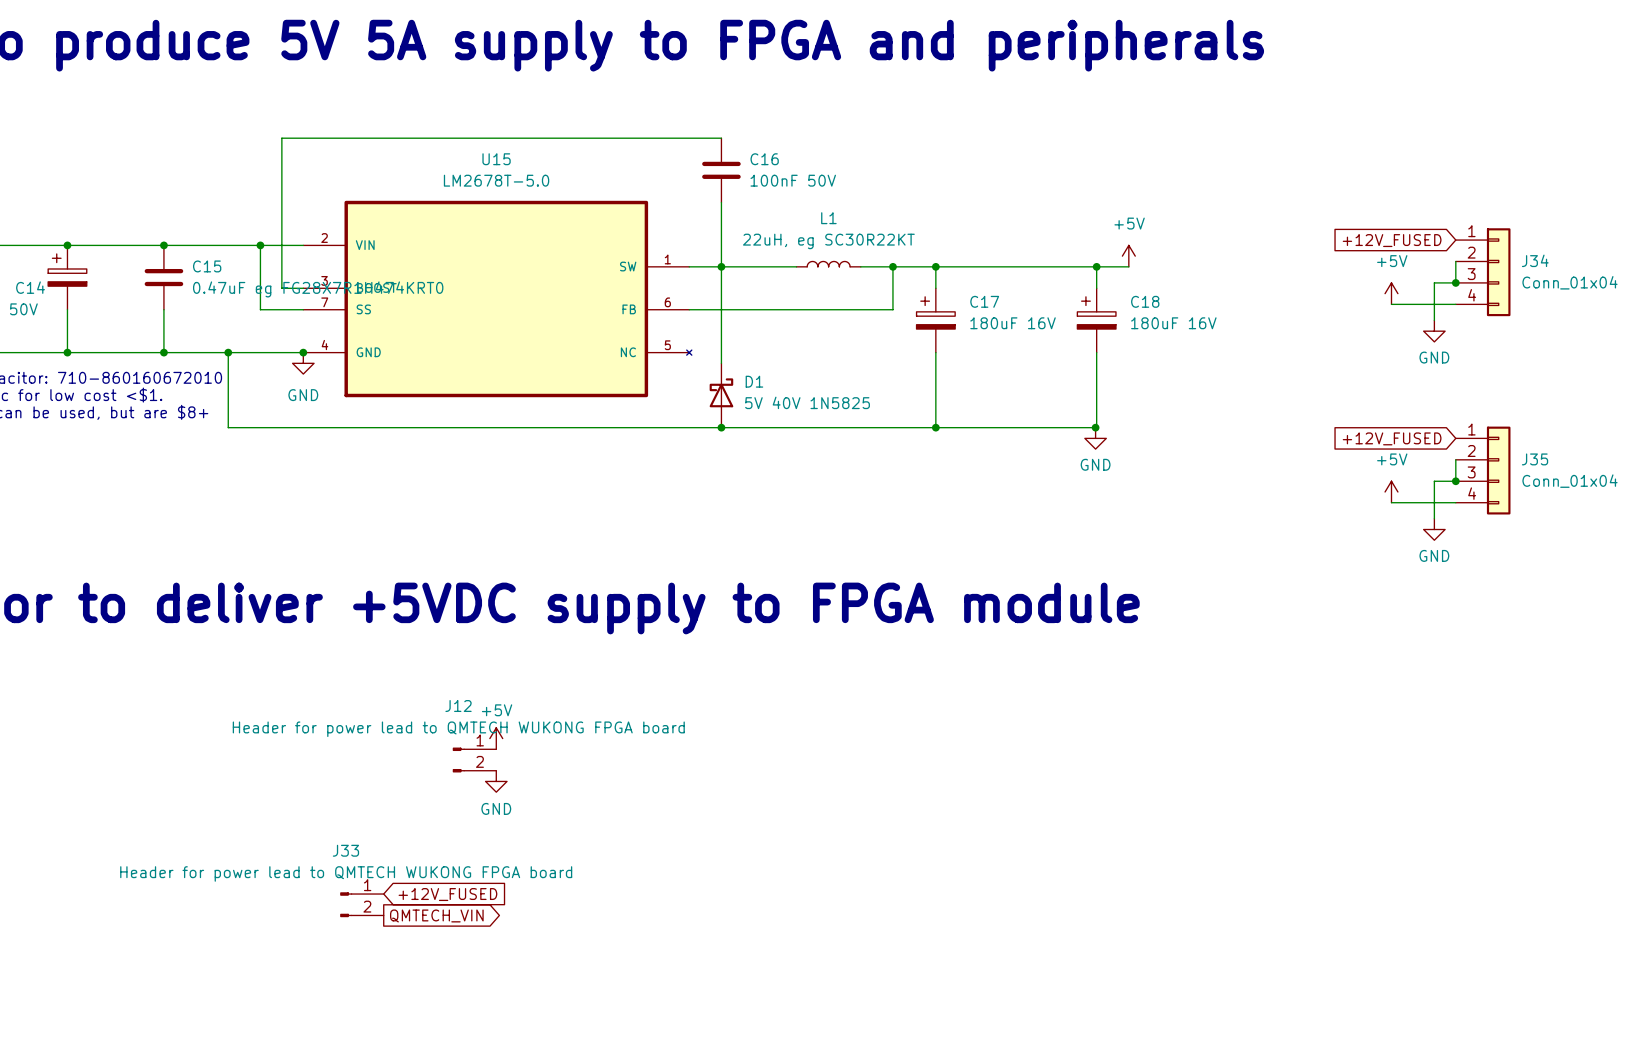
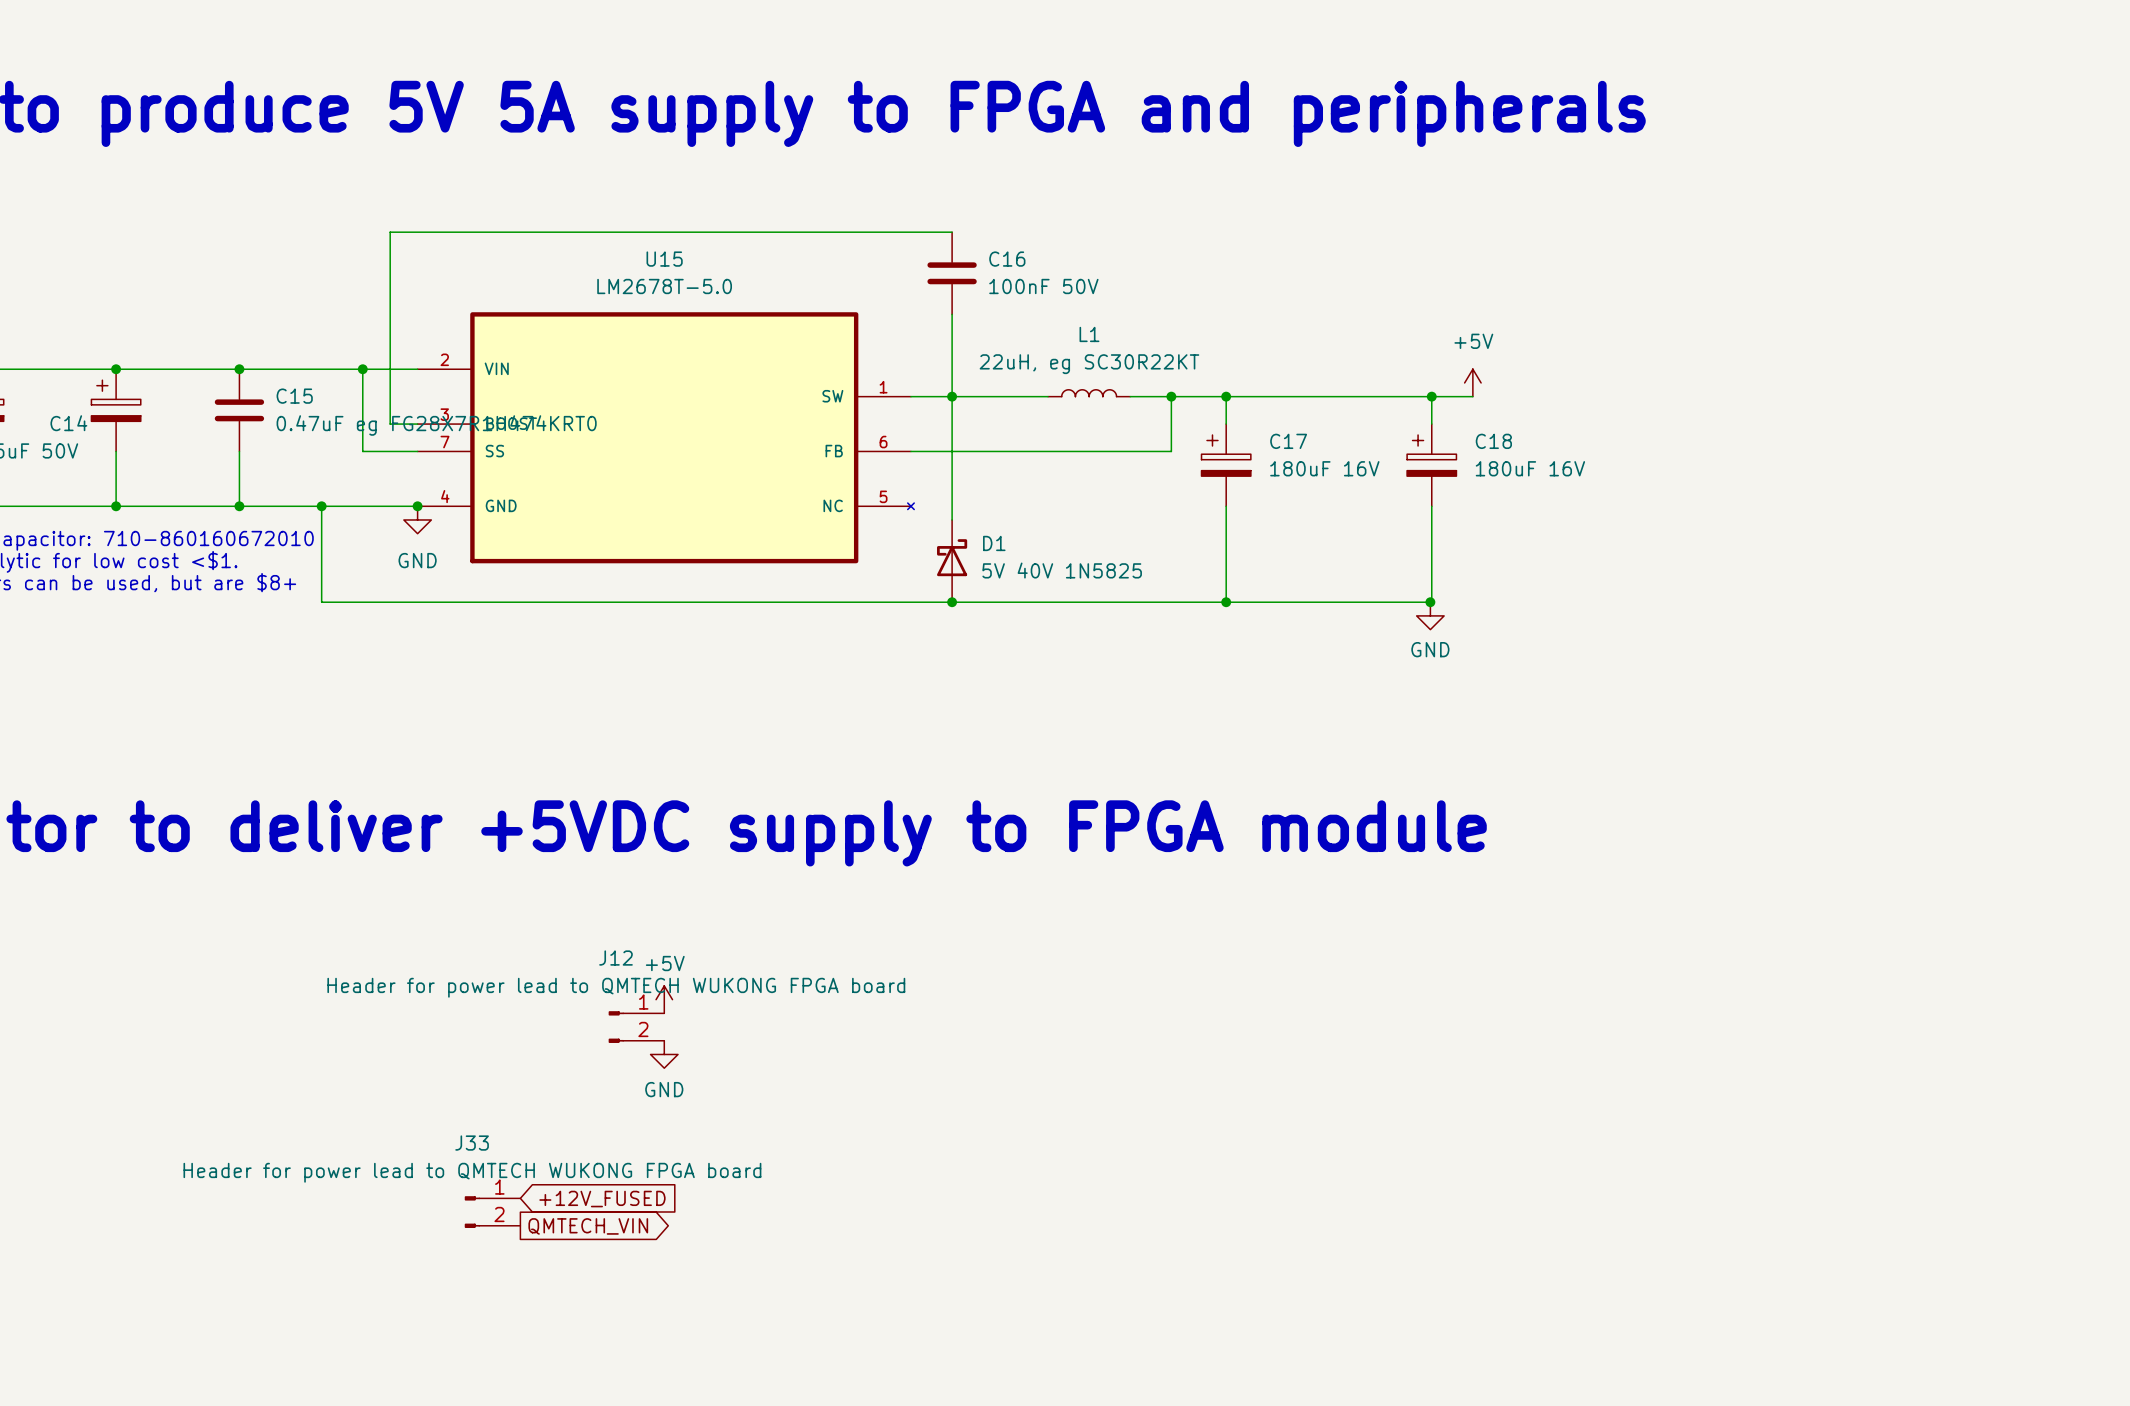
global label: +12V_FUSED (1392, 240) -> none
wire: (1455, 261) (1455, 282) (1434, 282) (1434, 320) -> none
J34: Conn_01x04 (1483, 272) -> none
junction: (1455, 282) -> none
power symbol: +5V (1391, 293) -> none
wire: (1391, 304) (1455, 304) -> none
power symbol: GND (1434, 331) -> none
global label: +12V_FUSED (1392, 438) -> none
wire: (1455, 459) (1455, 481) (1434, 481) (1434, 518) -> none
J35: Conn_01x04 (1483, 470) -> none
junction: (1455, 481) -> none
power symbol: +5V (1391, 491) -> none
wire: (1391, 502) (1455, 502) -> none
power symbol: GND (1434, 529) -> none

